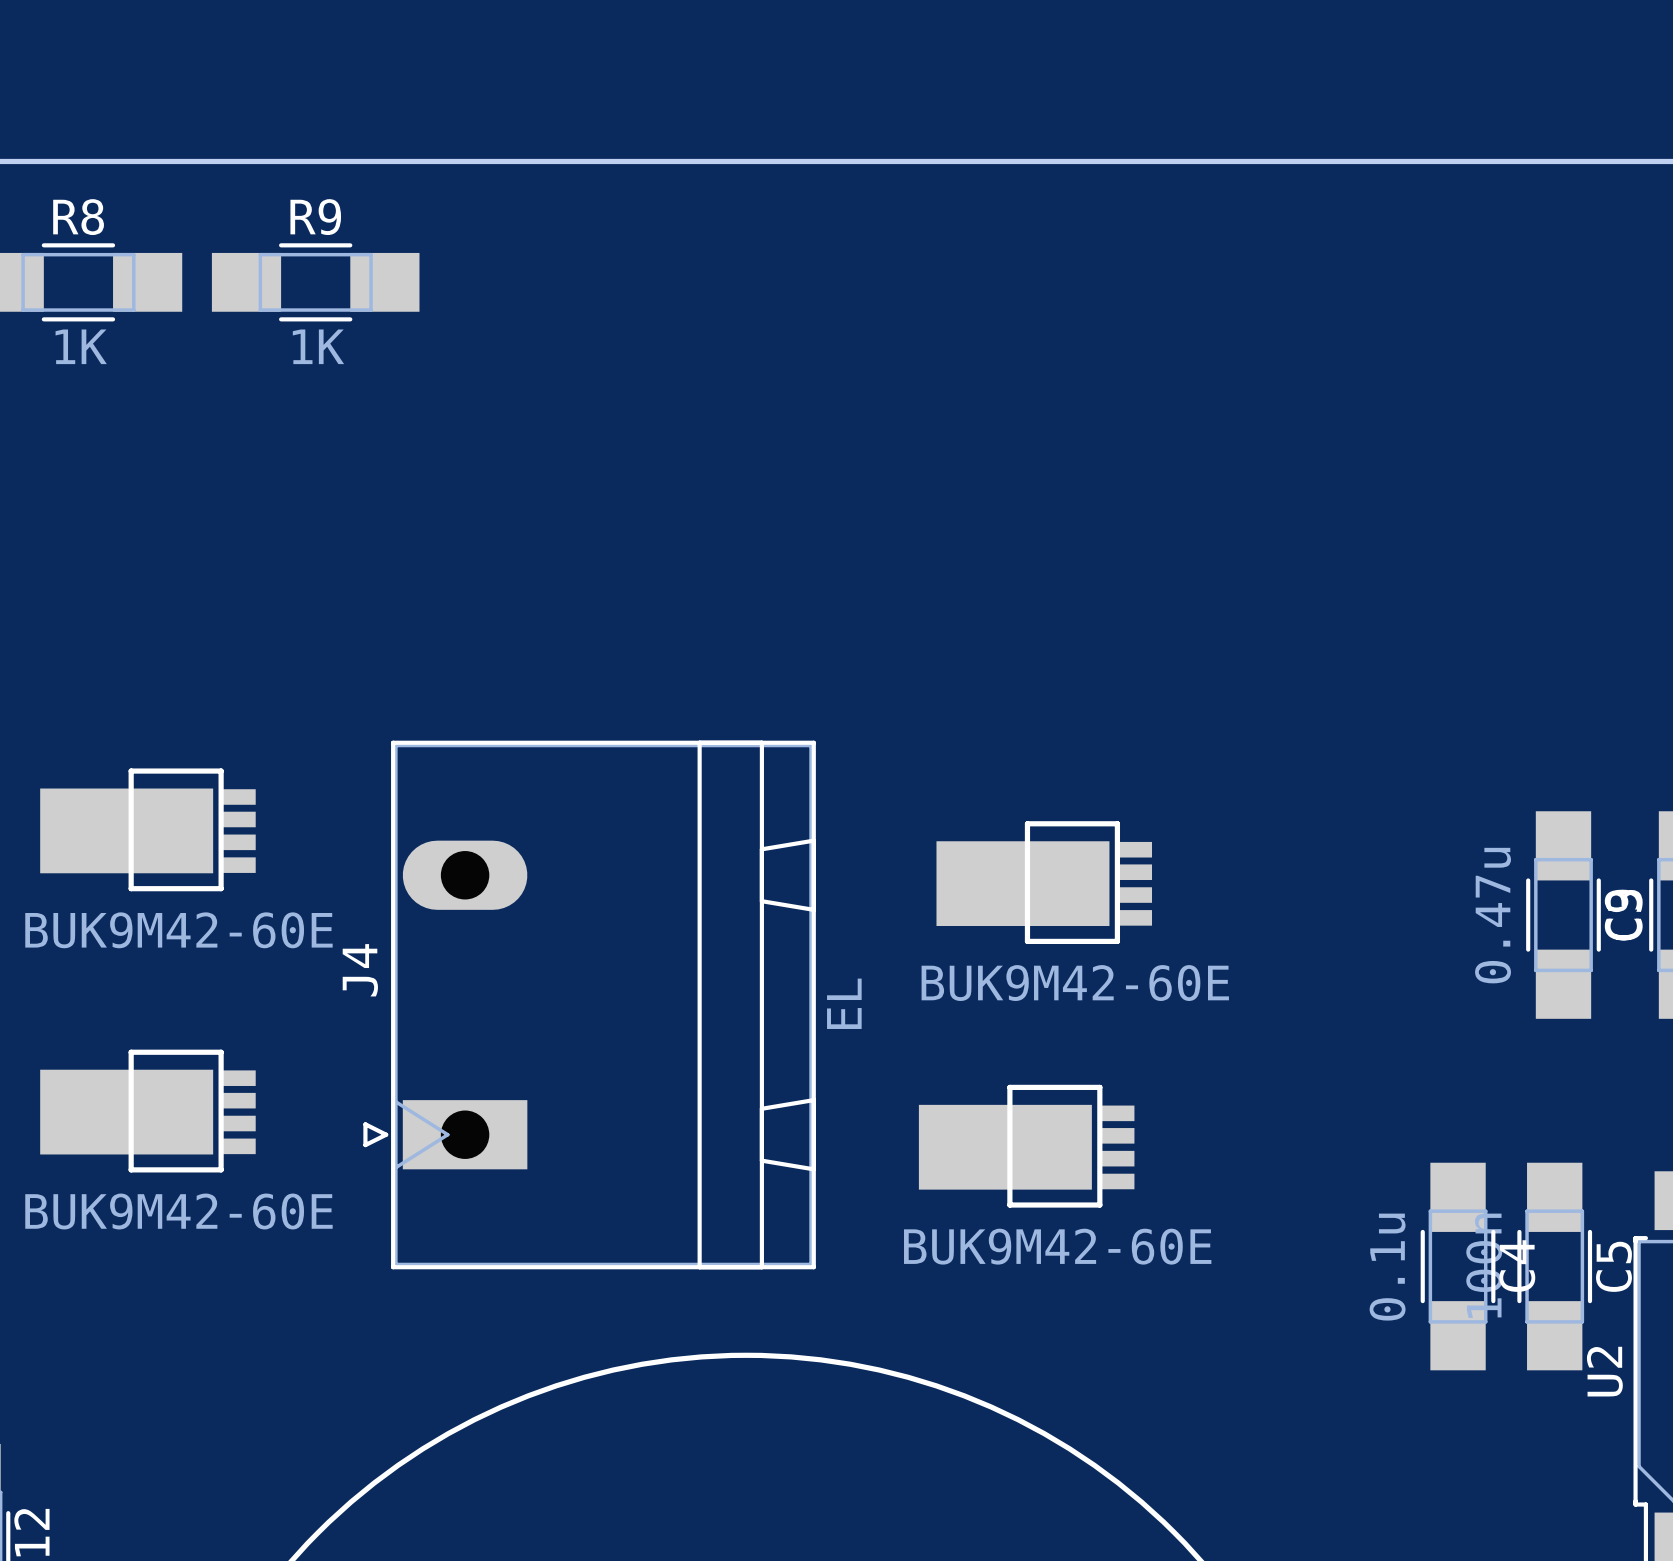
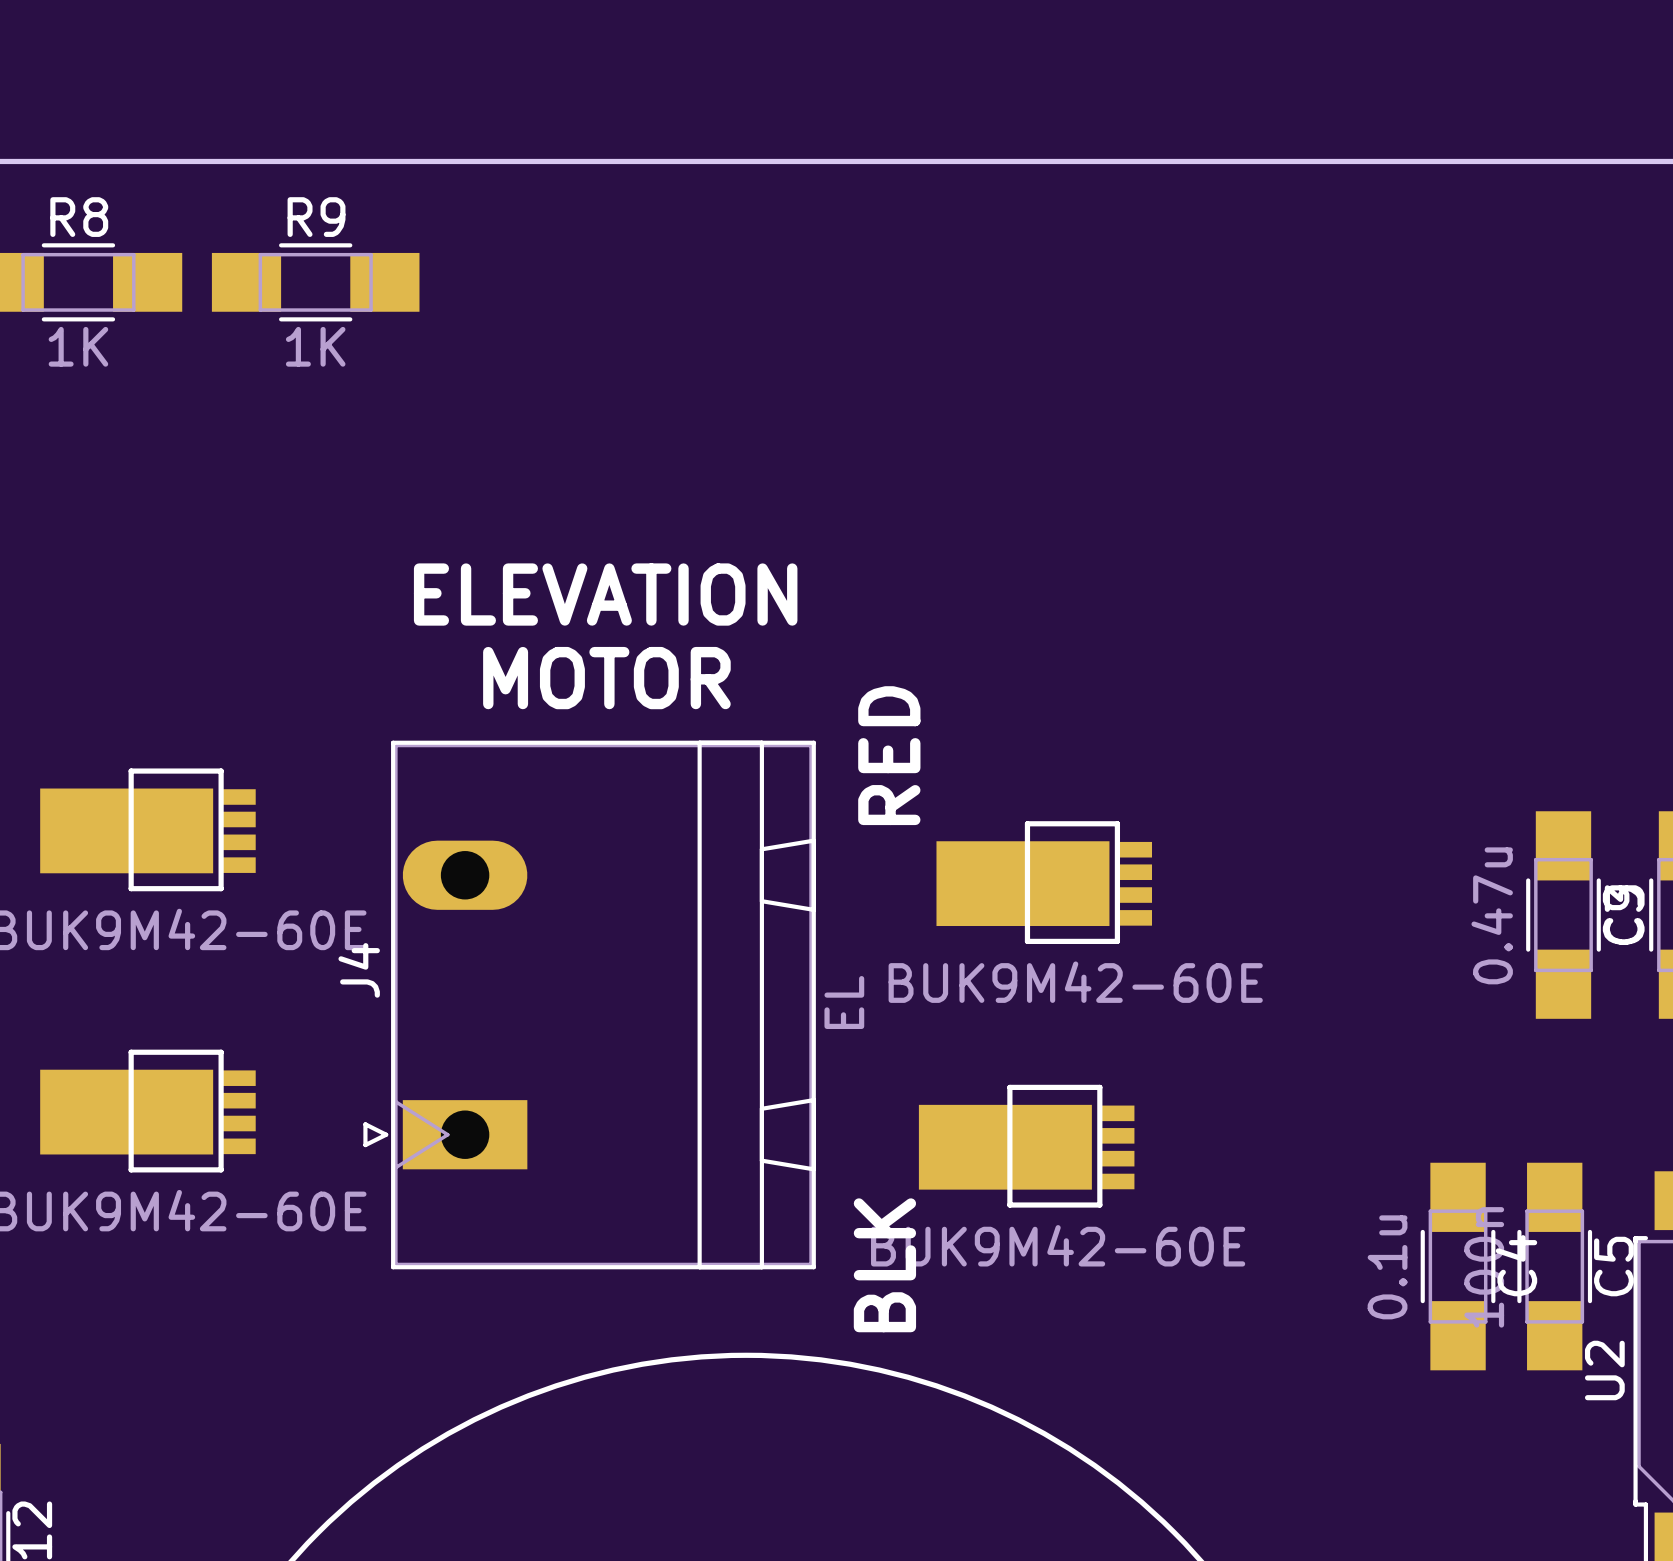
text: none -> ELEVATION (605, 594)
text: none -> MOTOR (606, 678)
text: none -> RED (889, 755)
text: none -> BLK (884, 1265)

